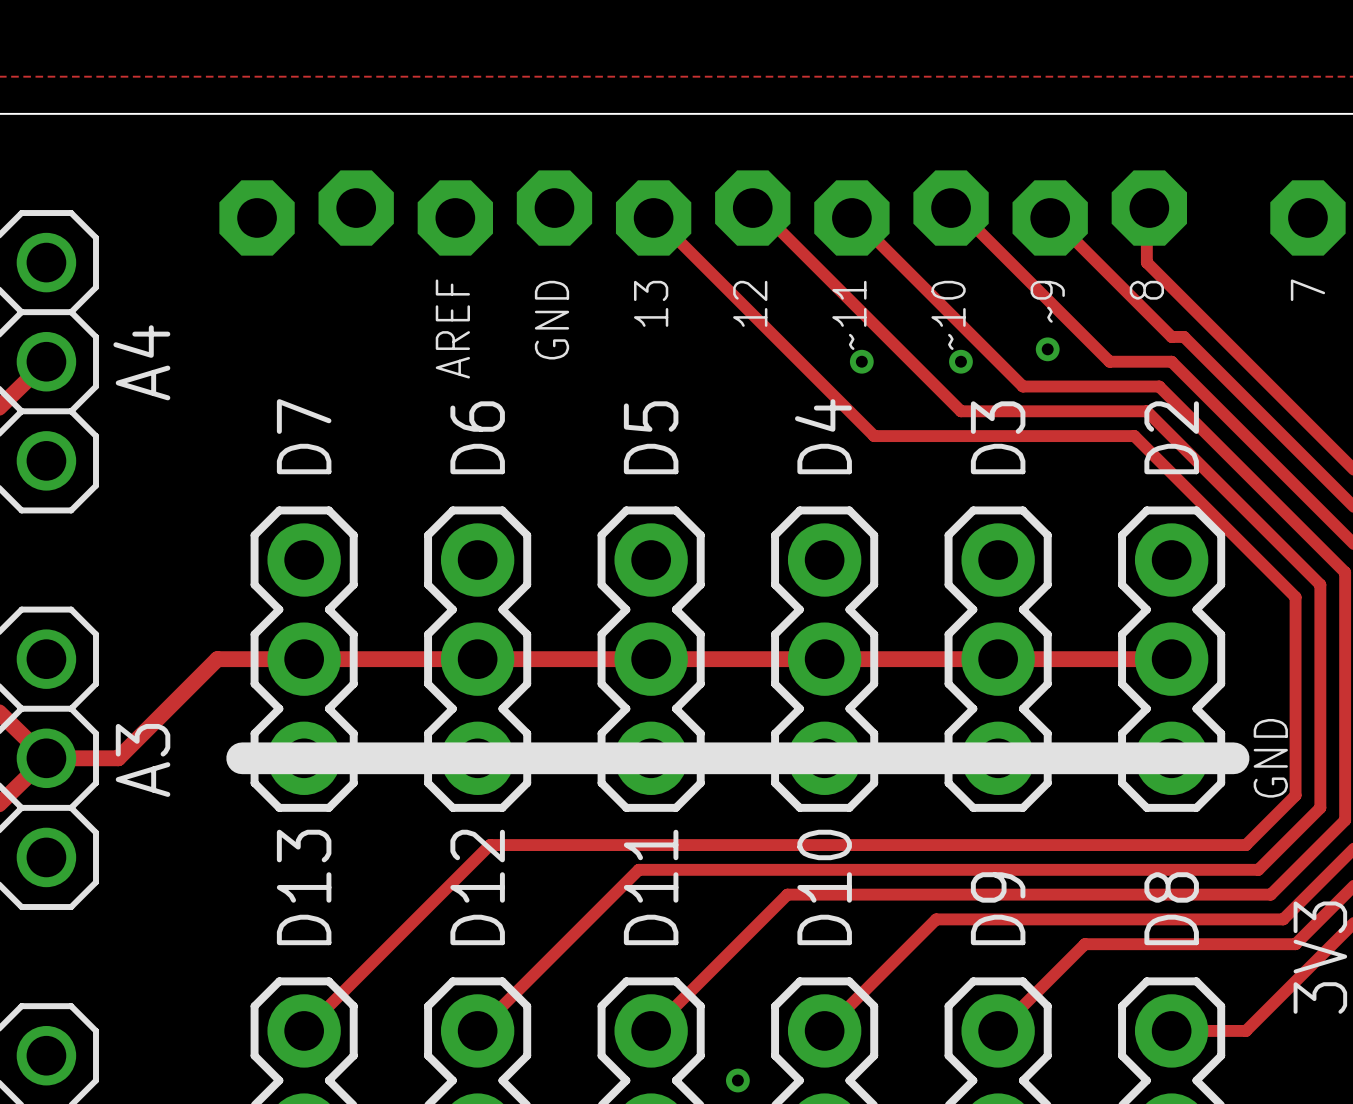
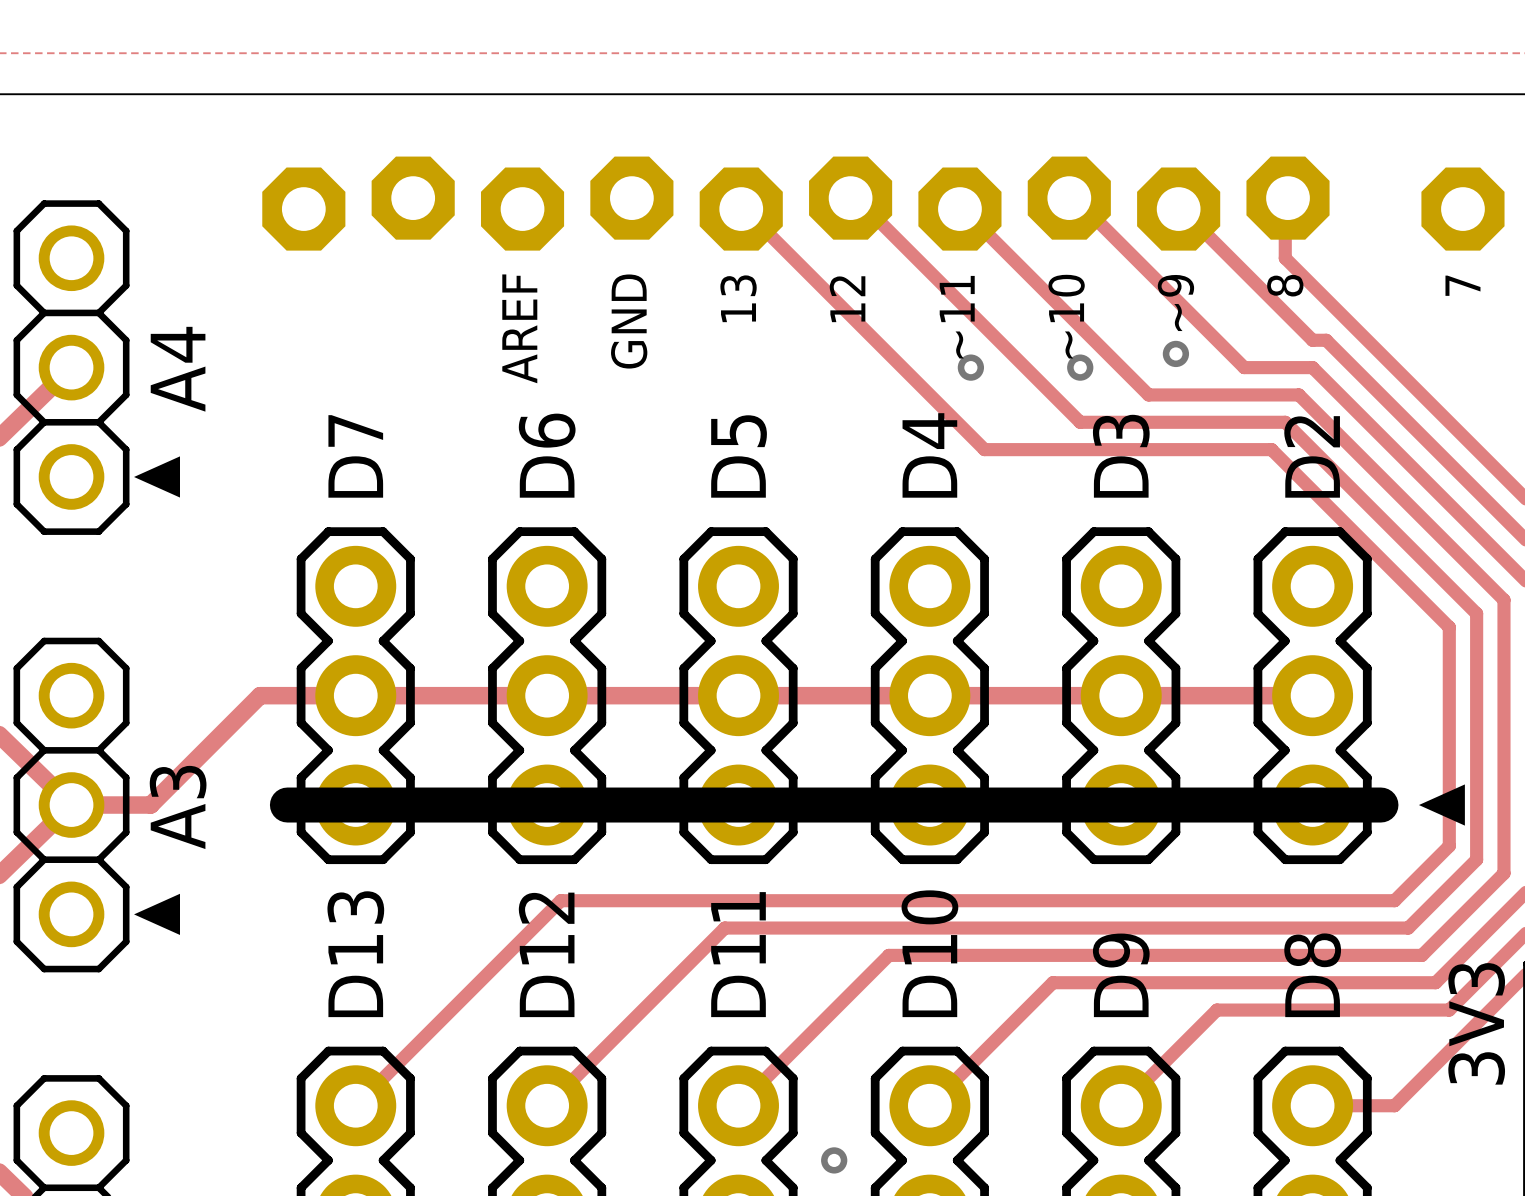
text: none -> ▲ (157, 476)
text: GND (1270, 758) -> ▲ (1441, 805)
text: none -> ▲ (157, 914)

